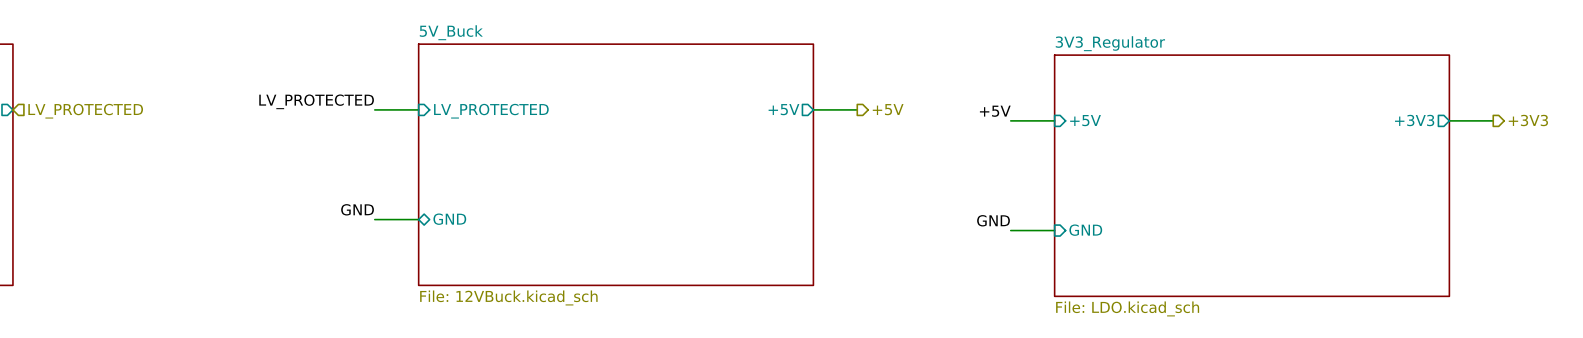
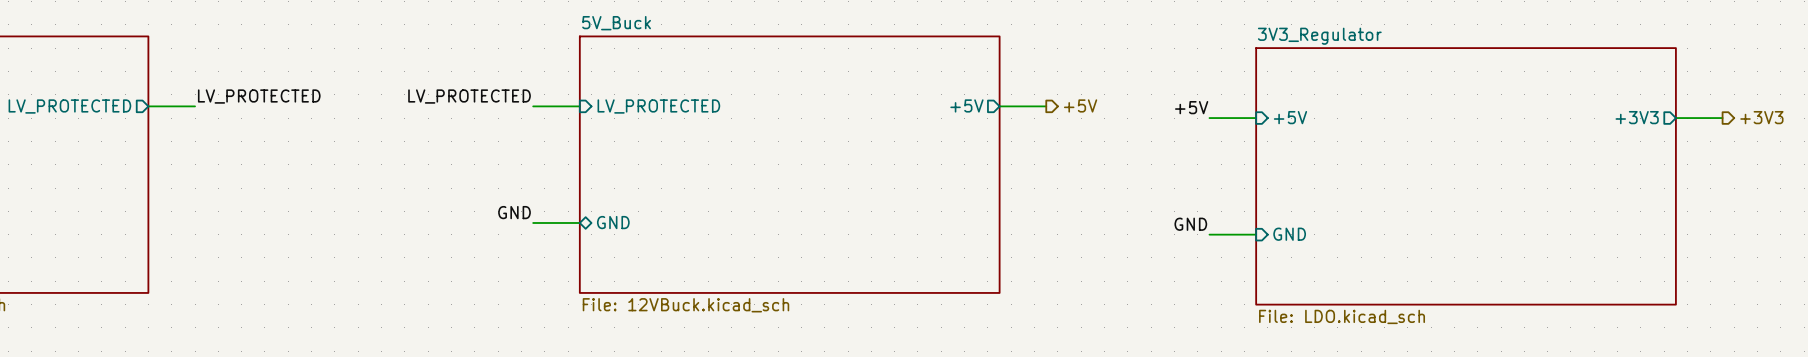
label: none -> LV_PROTECTED (259, 96)
wire: none -> (148, 106) (195, 106)
hierarchical label: LV_PROTECTED (85, 111) -> none

